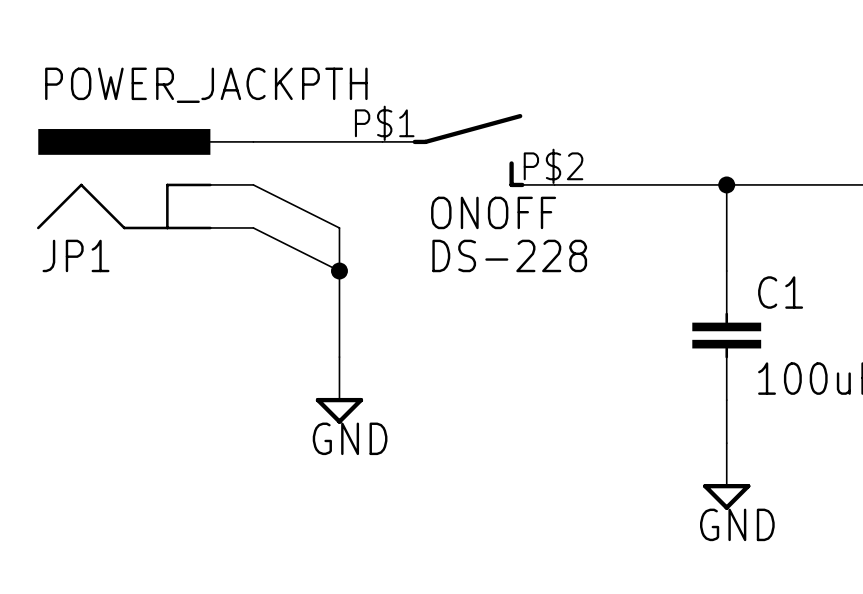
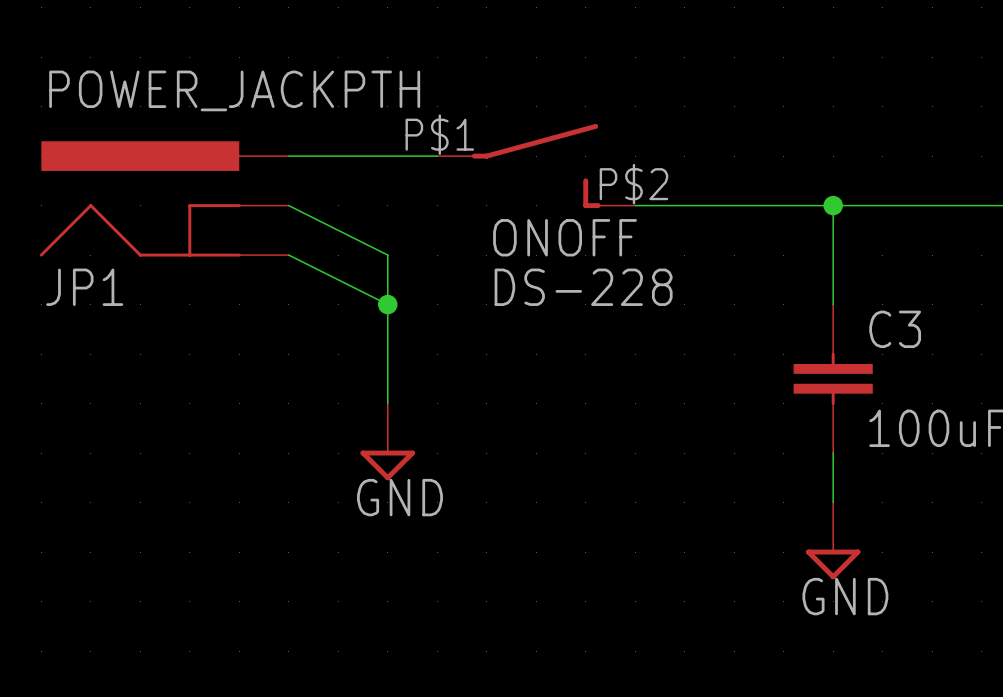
C1 name: C1 (780, 292) -> C3 (895, 329)

